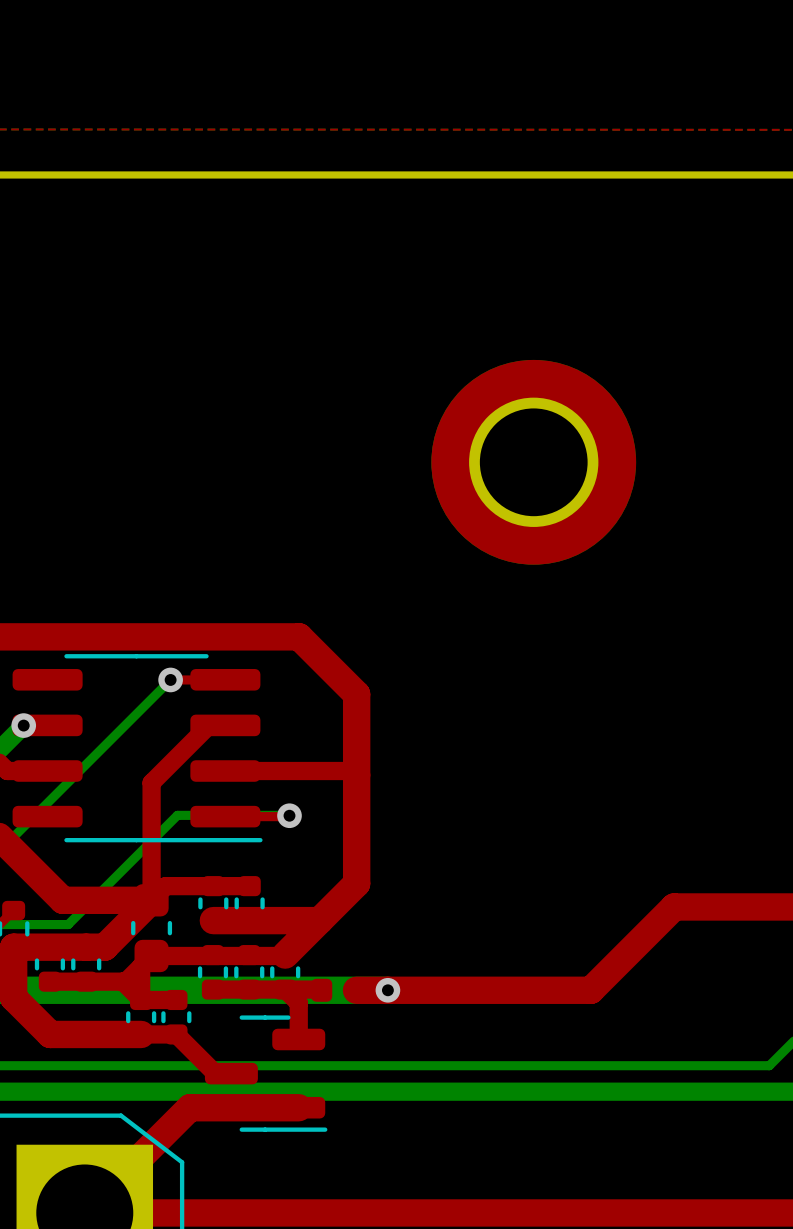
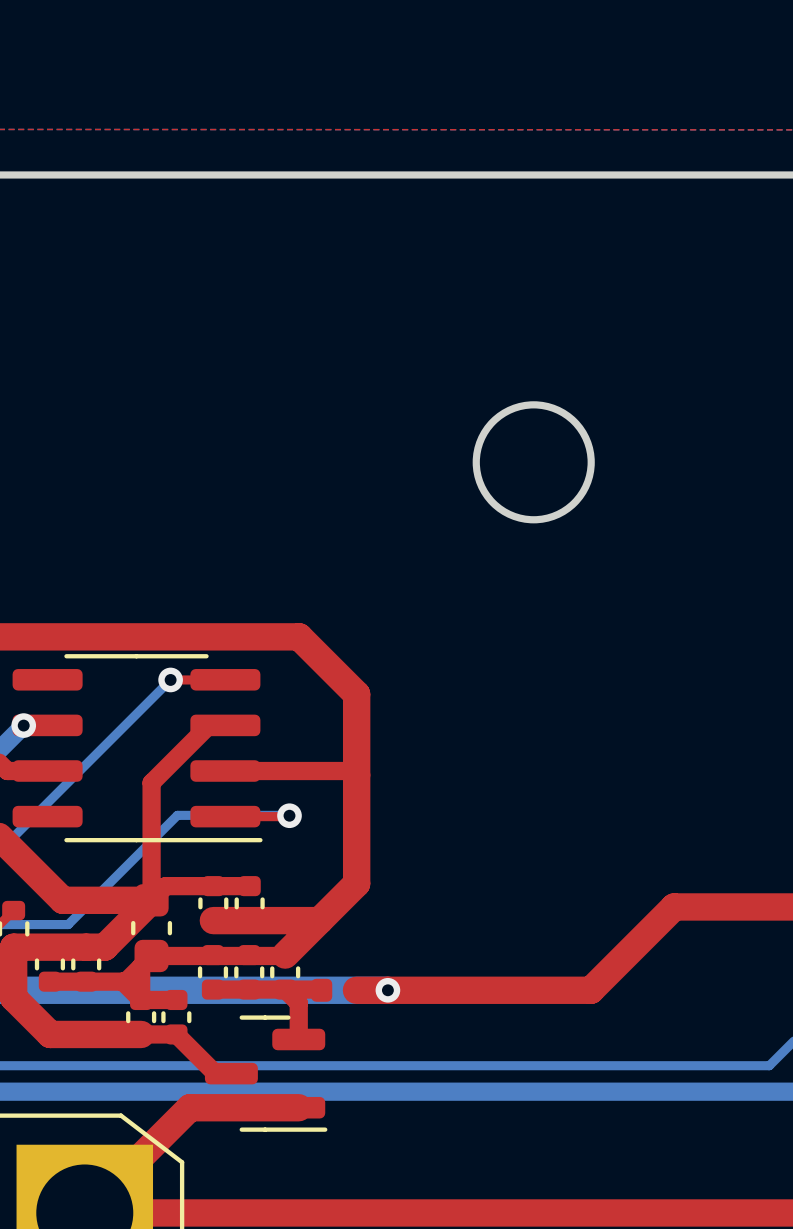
part: (533, 462) -> none

